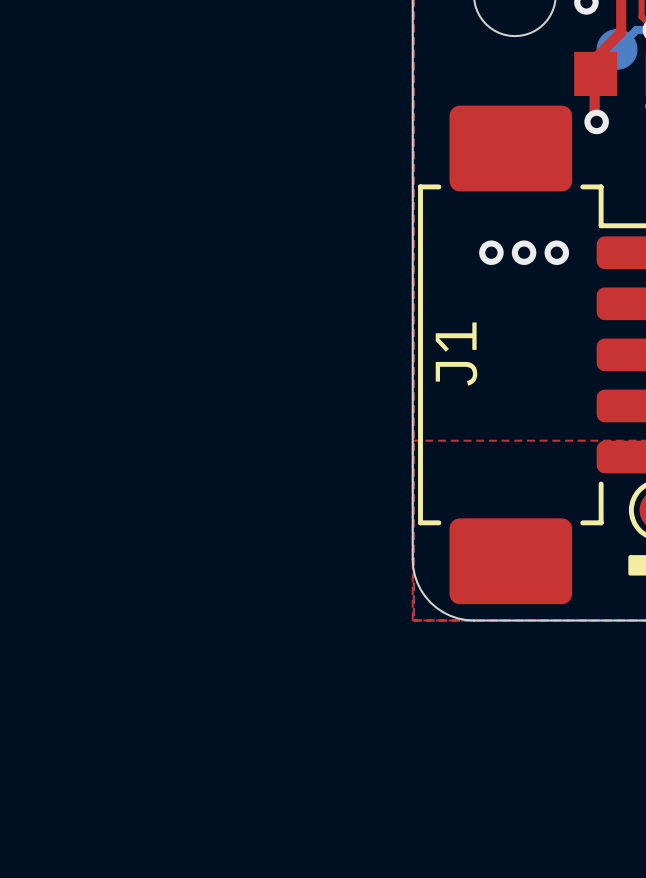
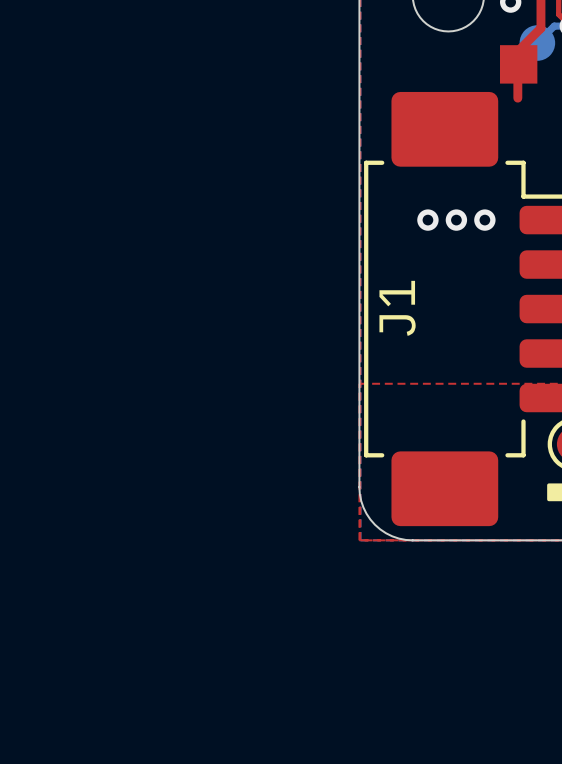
via: (596, 121) -> none

